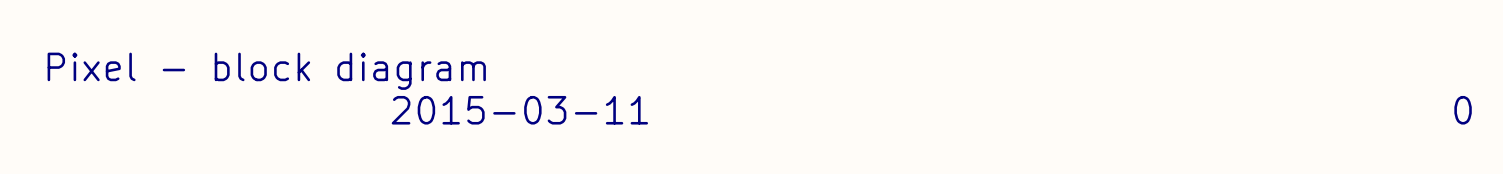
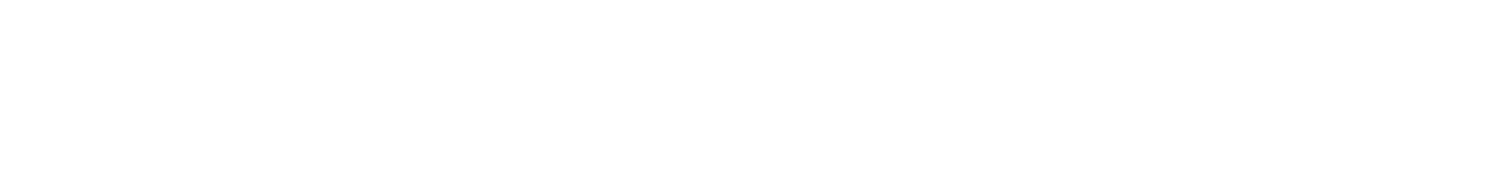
text: Pixel - block diagram (266, 71) -> none
text: 2015-03-11 (519, 110) -> none
text: 0 (1463, 110) -> none

